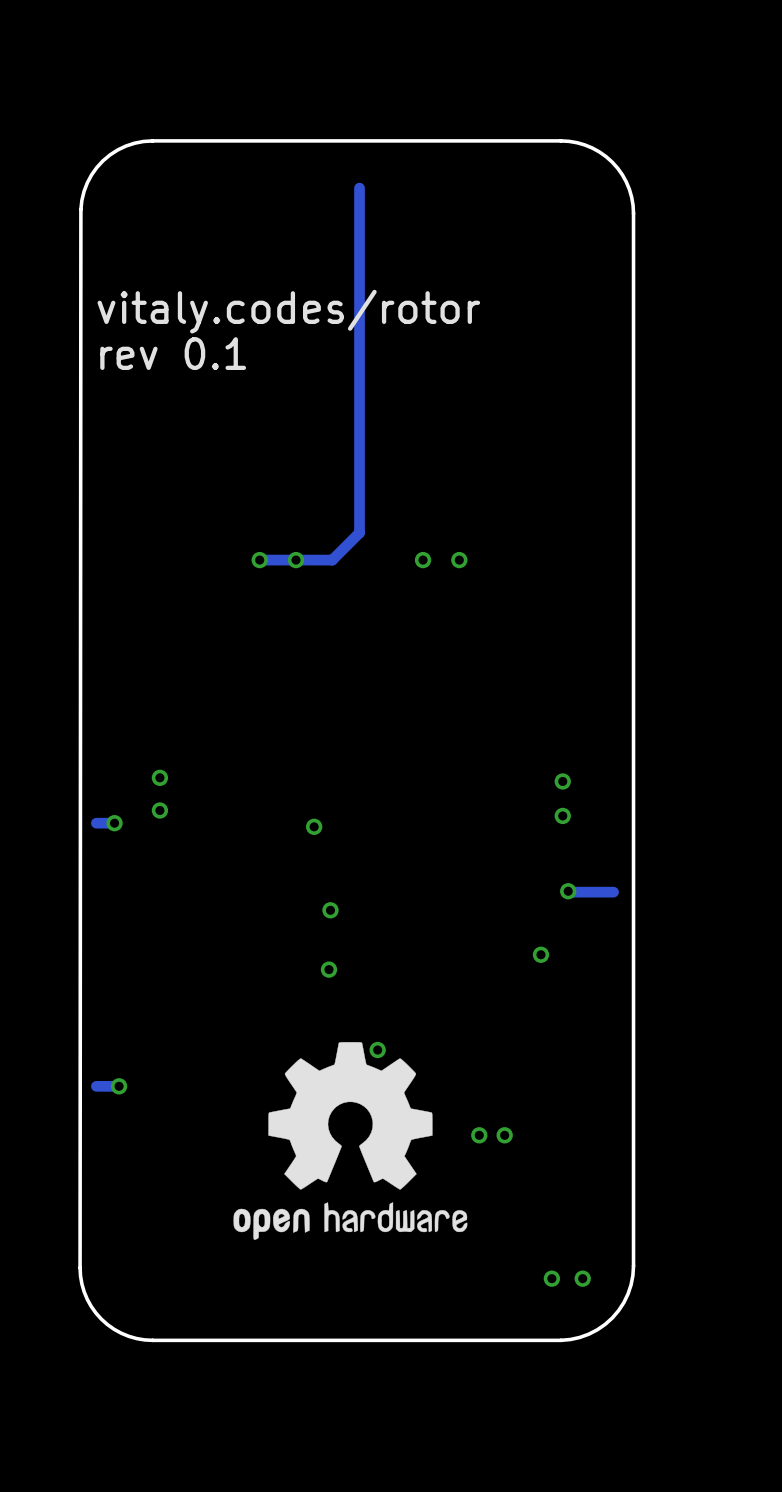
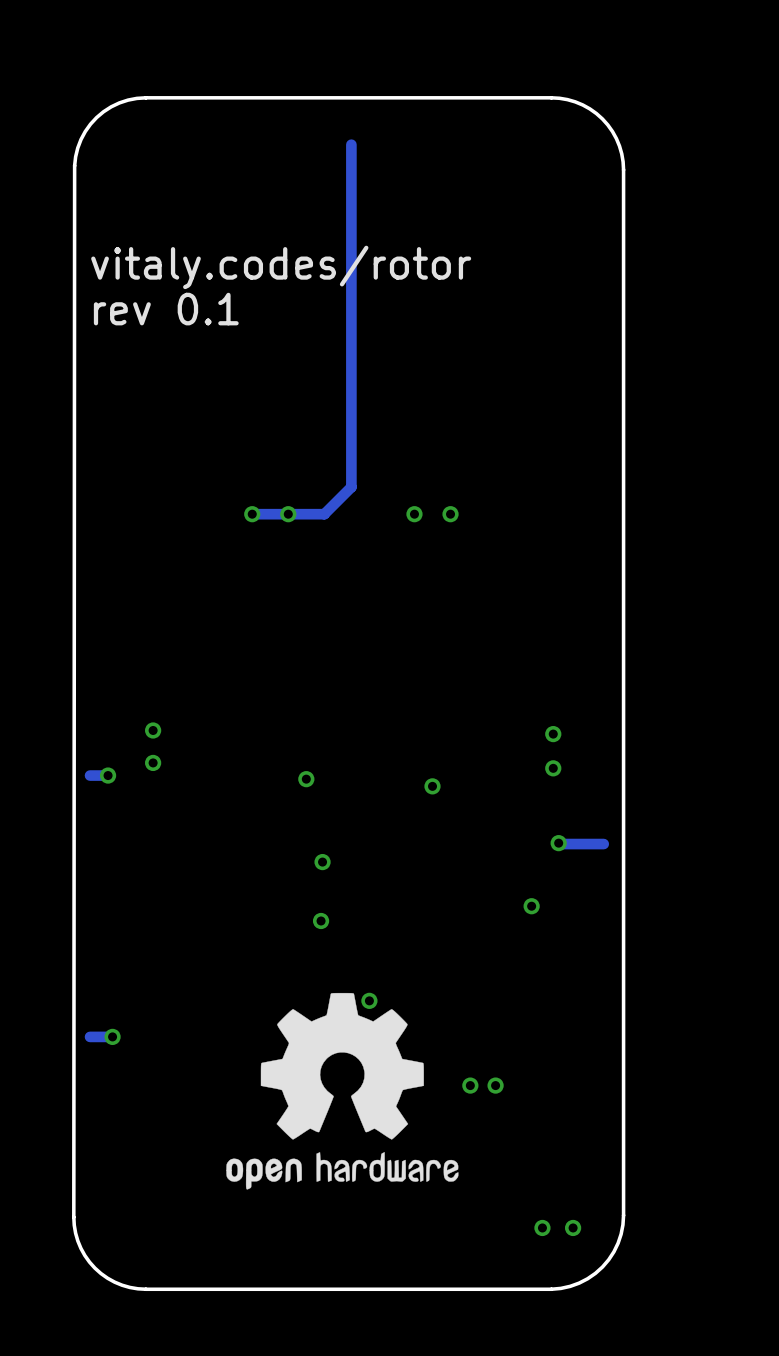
via: none -> (432, 786)

